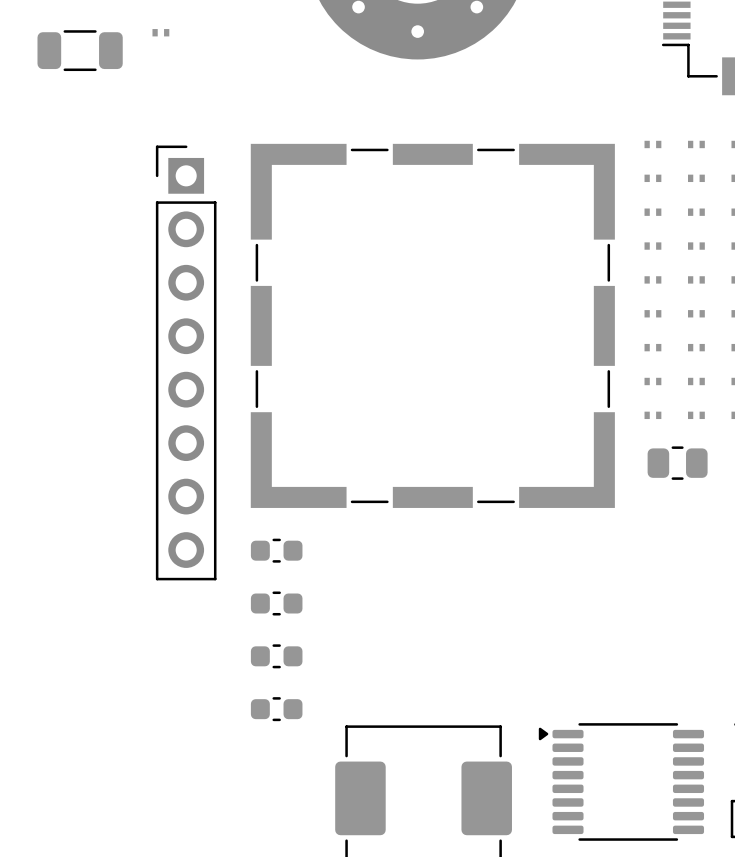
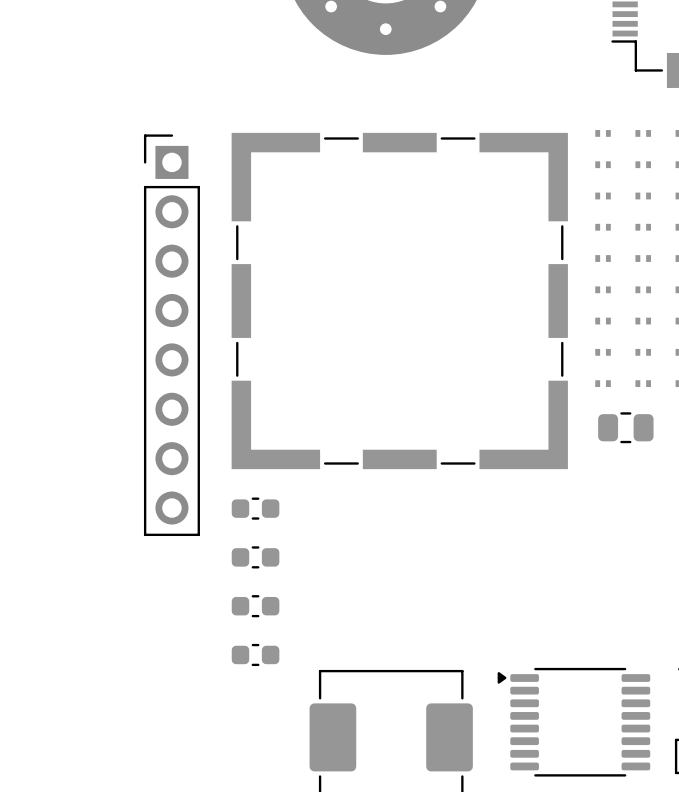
part: (160, 32) -> none
part: (80, 50) -> none

